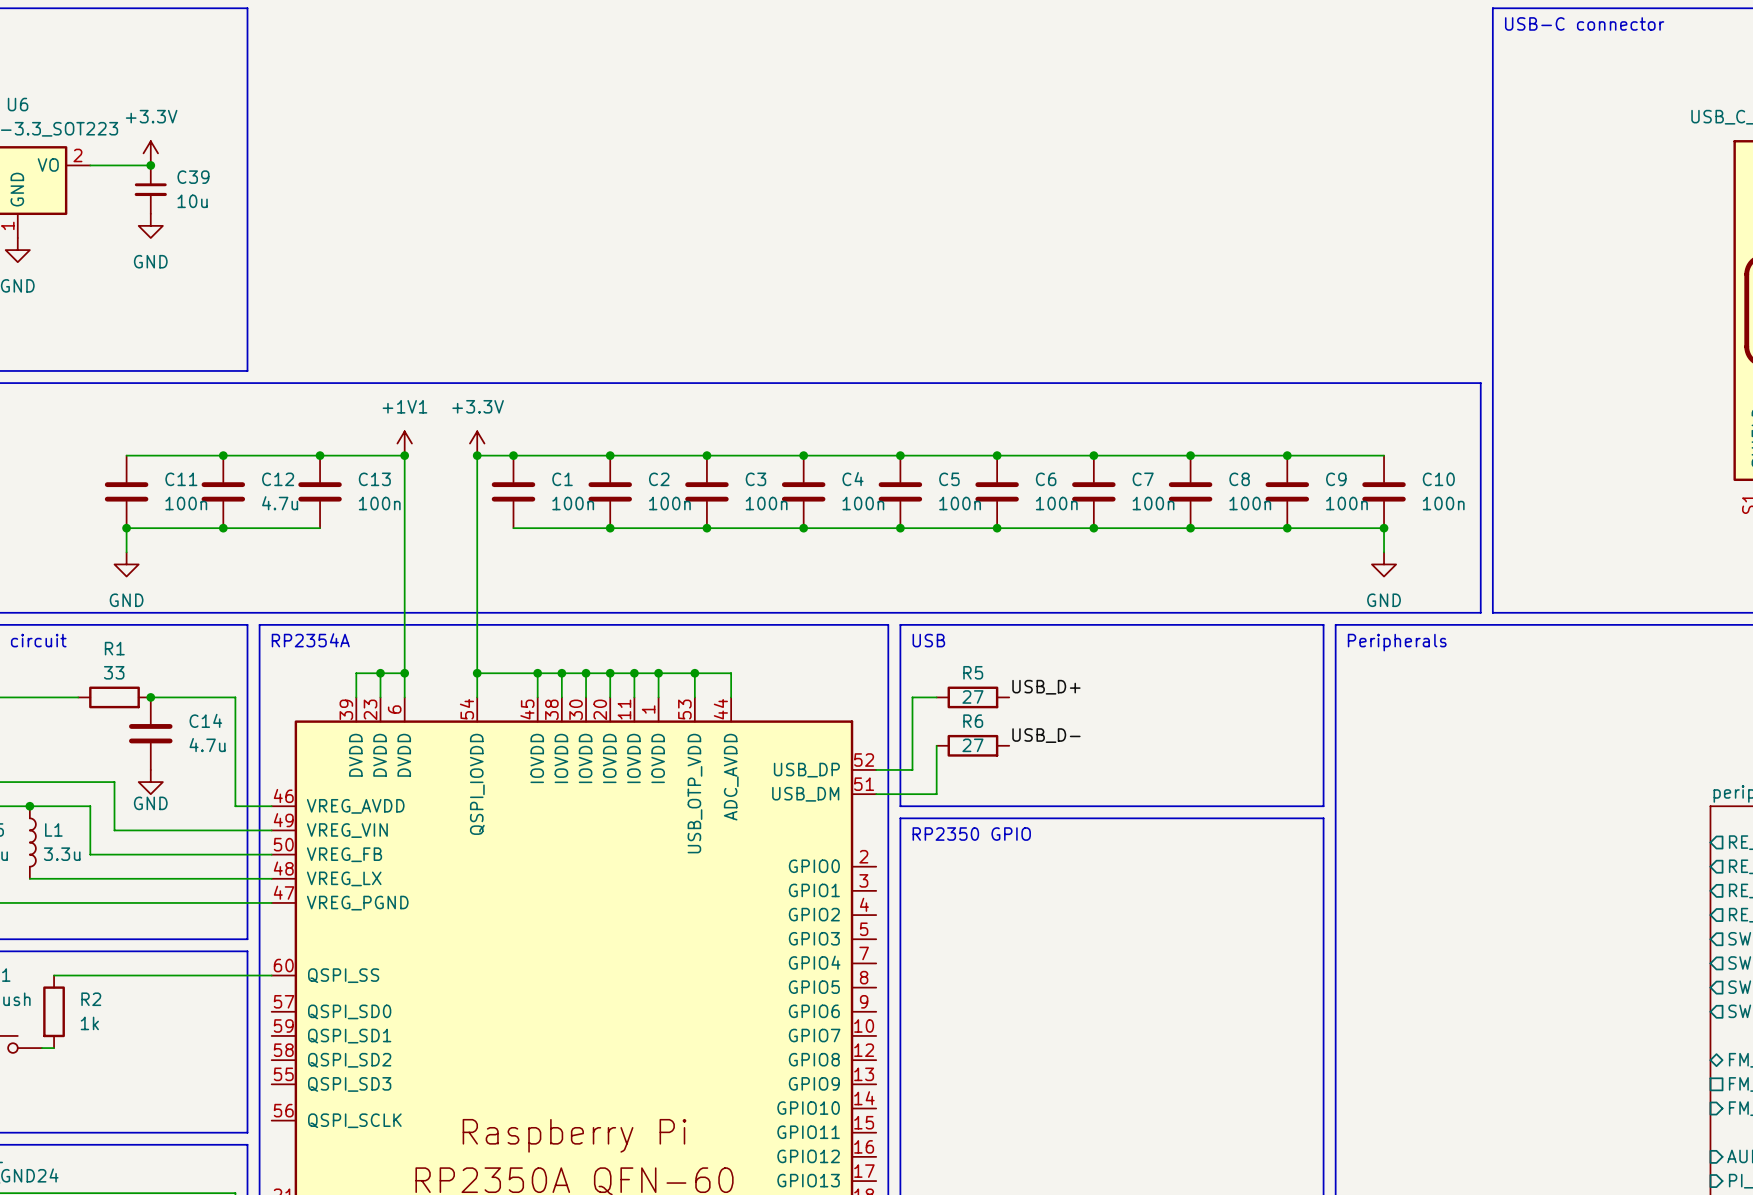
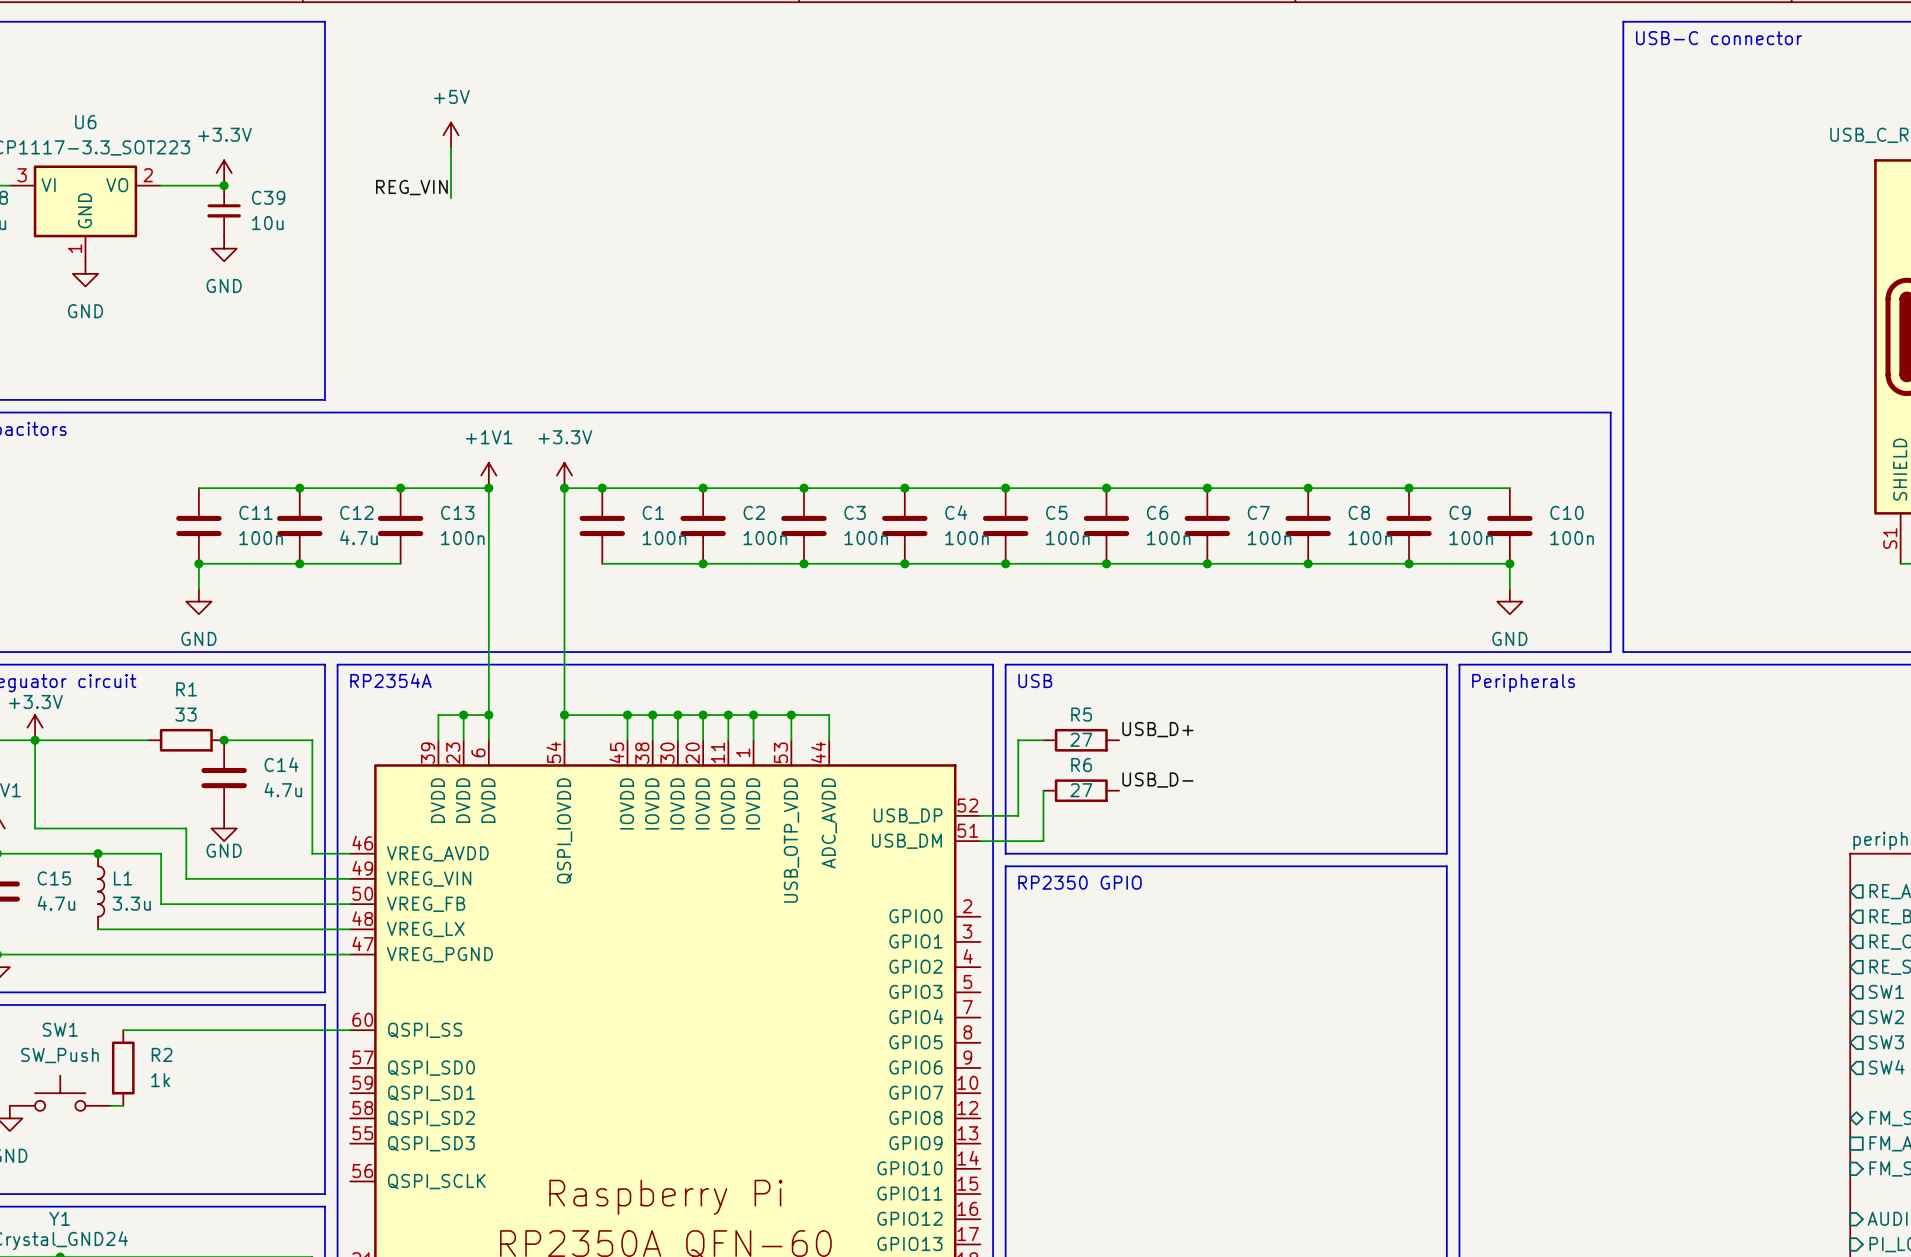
power symbol: none -> +5V (451, 135)
wire: none -> (451, 147) (451, 198)
label: none -> REG_VIN (411, 187)

